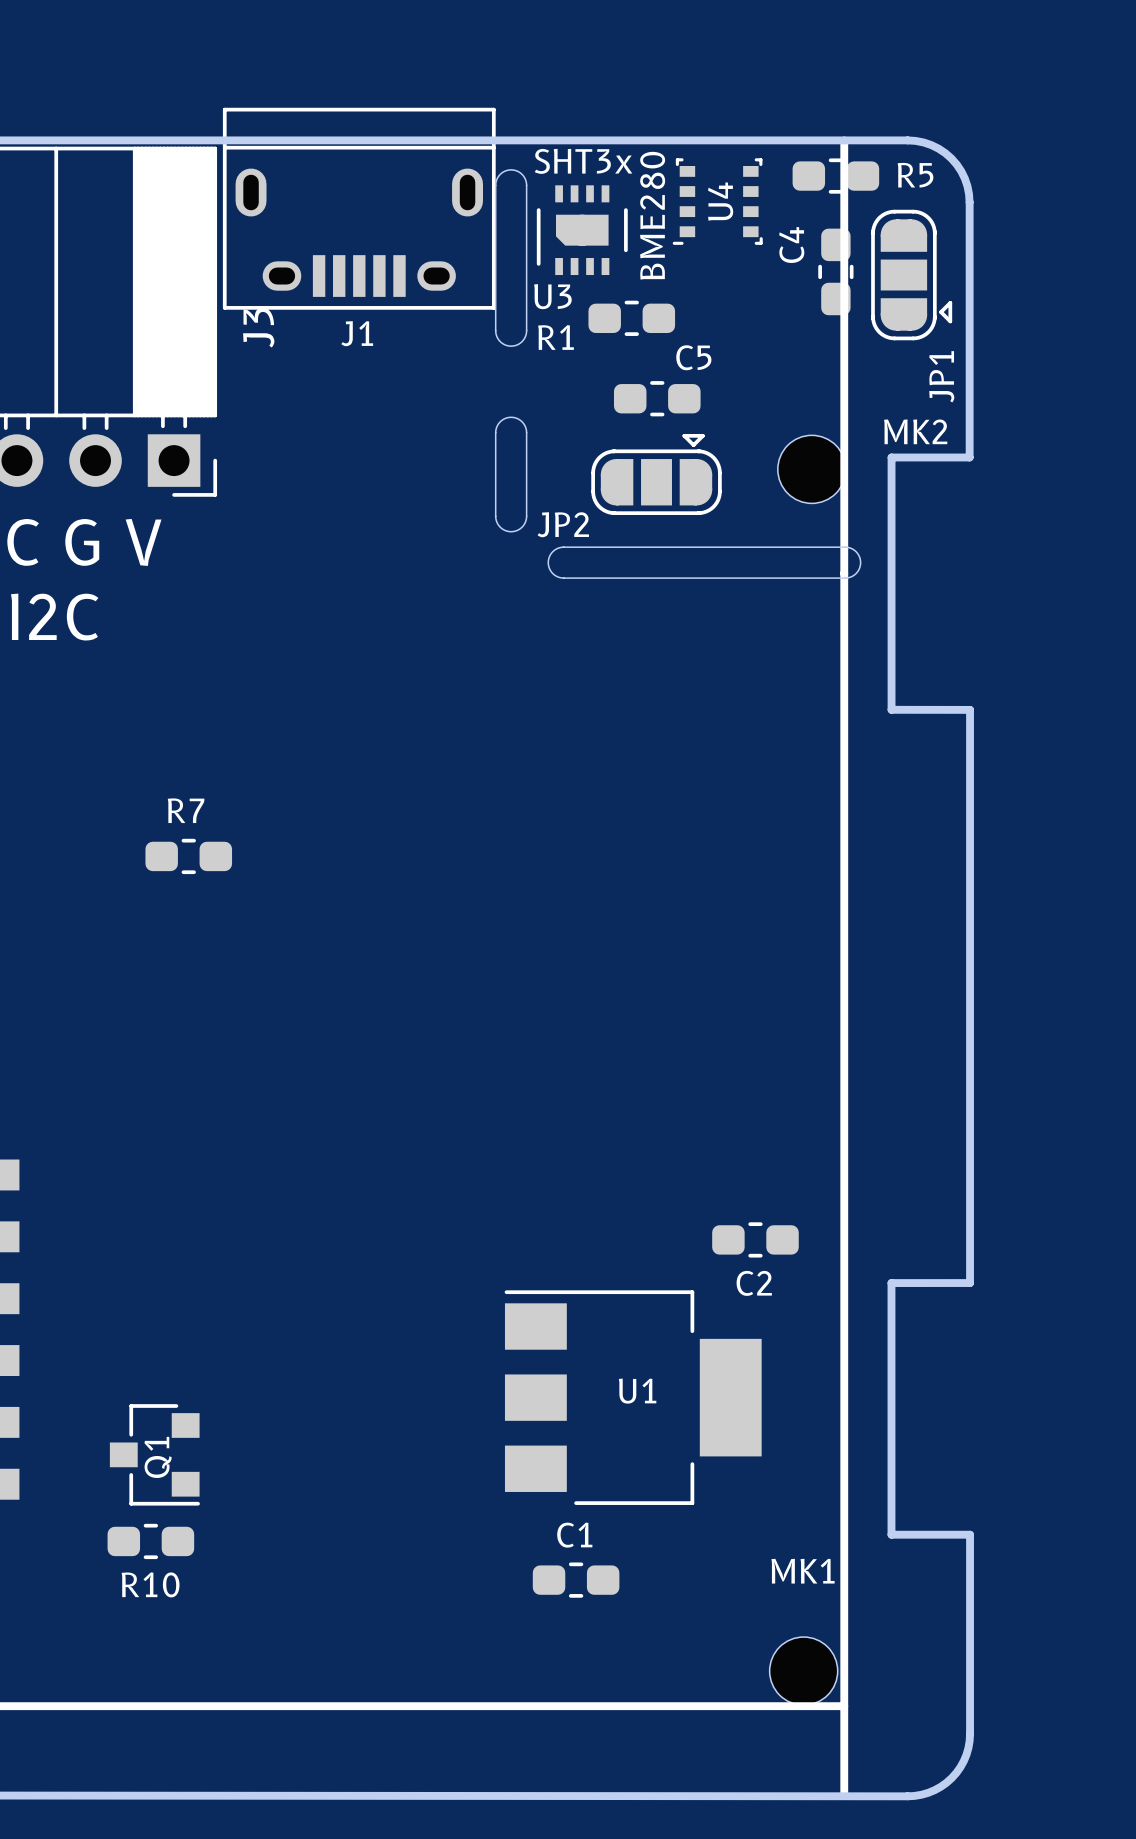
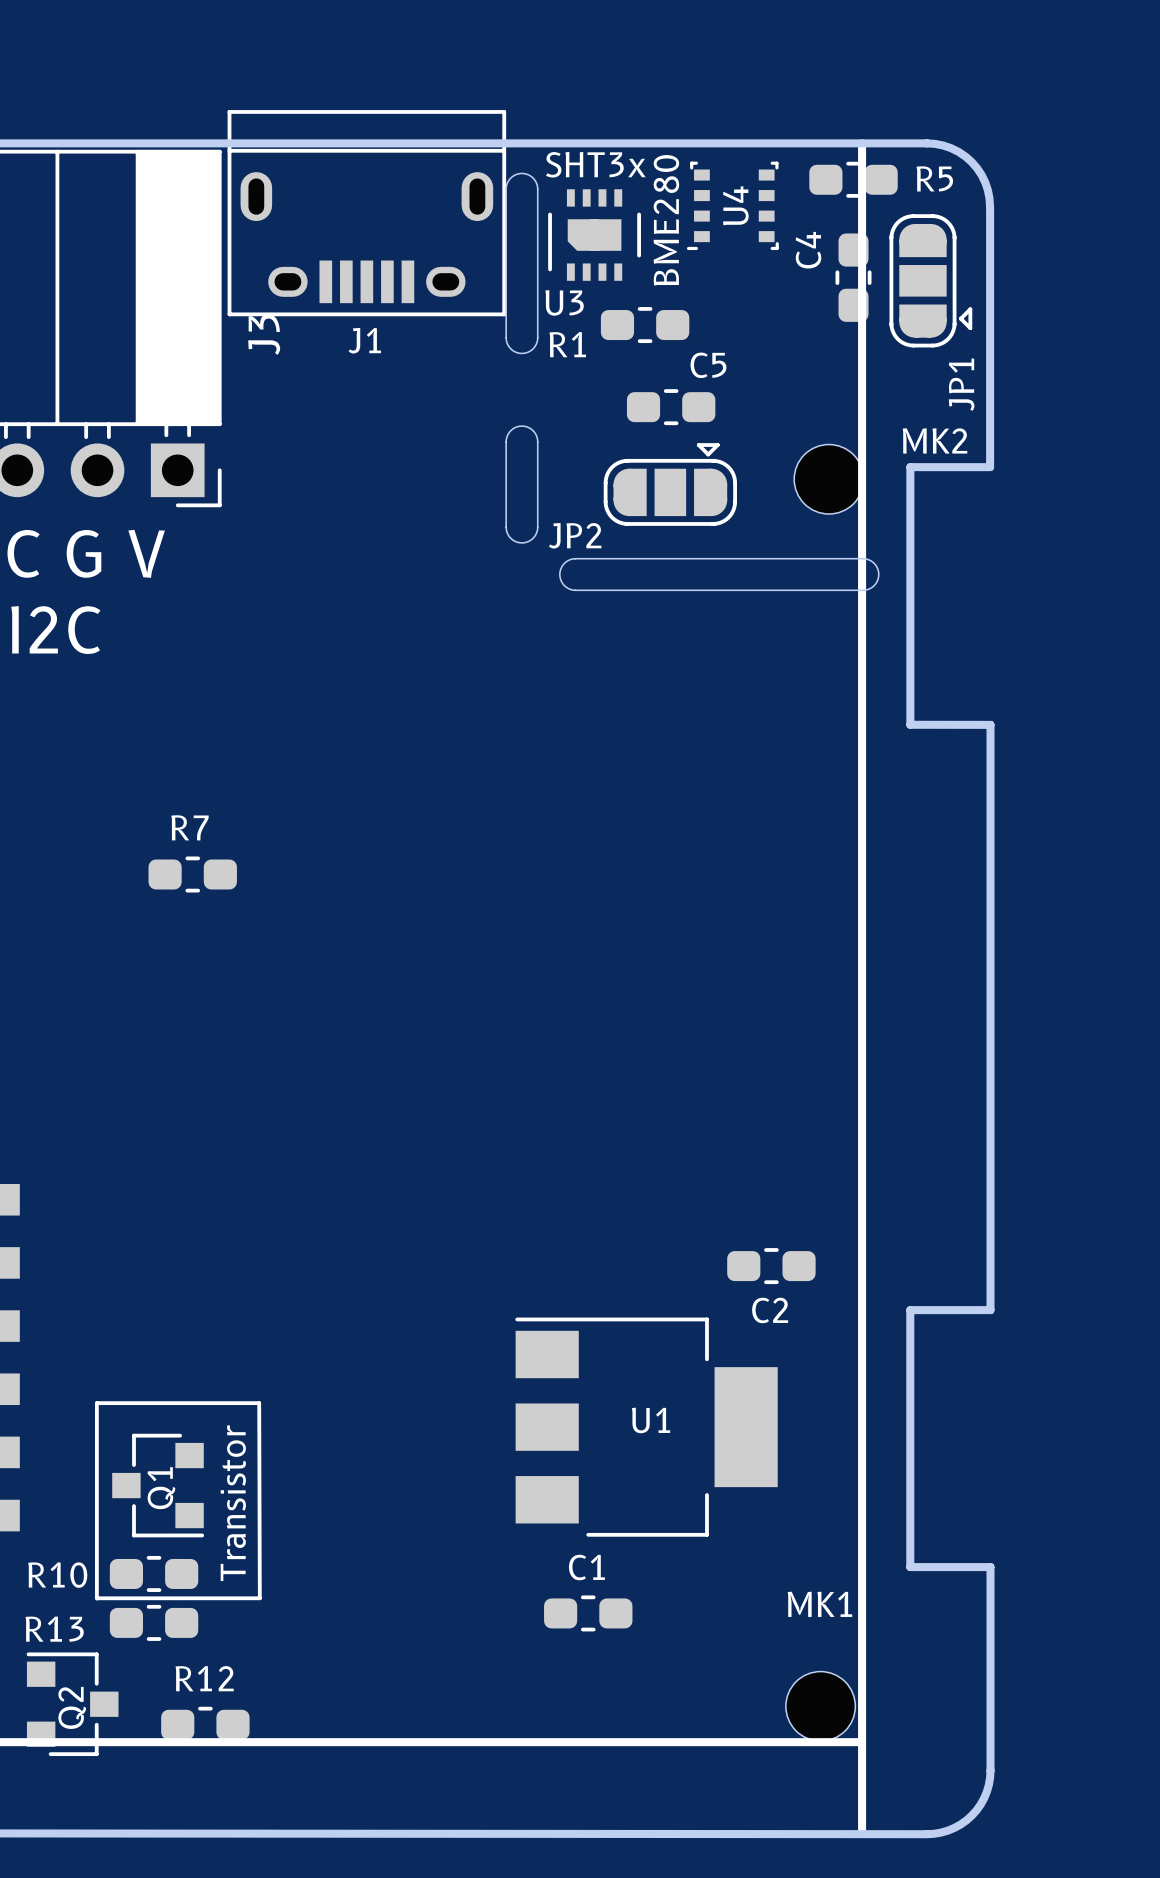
text: none -> Transistor (233, 1503)
line: none -> (97, 1598) (259, 1598) (259, 1403) (96, 1403) (96, 1598)
R10 name position: R10 (150, 1584) -> R10 (57, 1575)
R13: none -> (154, 1622)
Q2: none -> (72, 1704)
R12: none -> (205, 1724)

